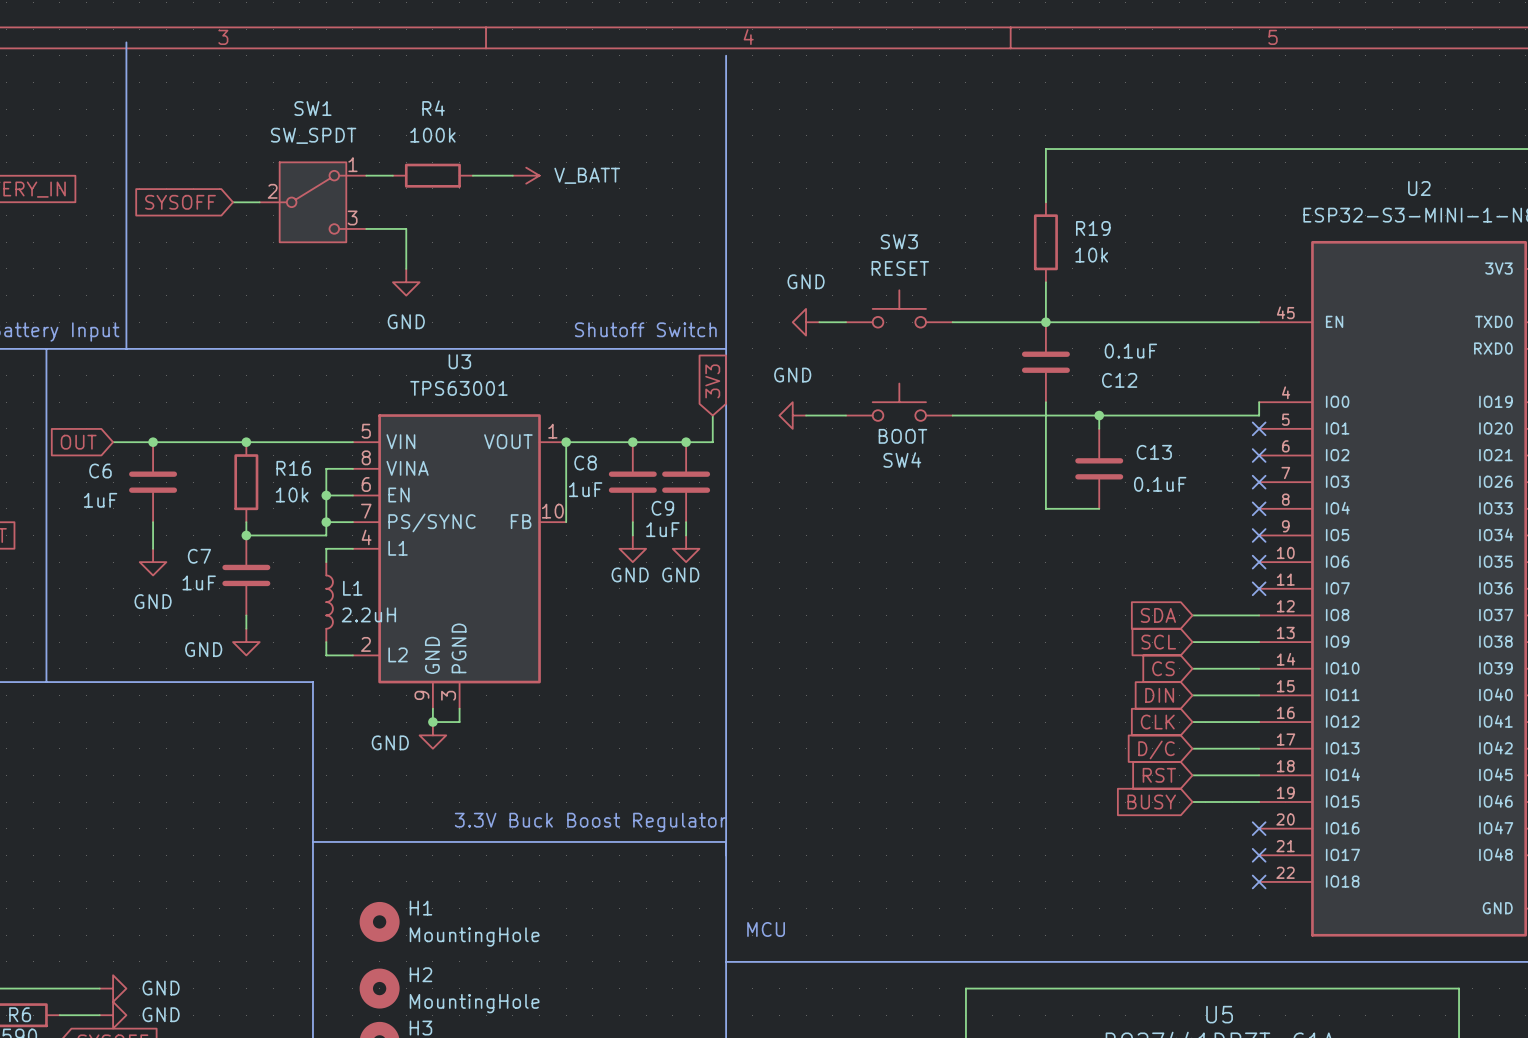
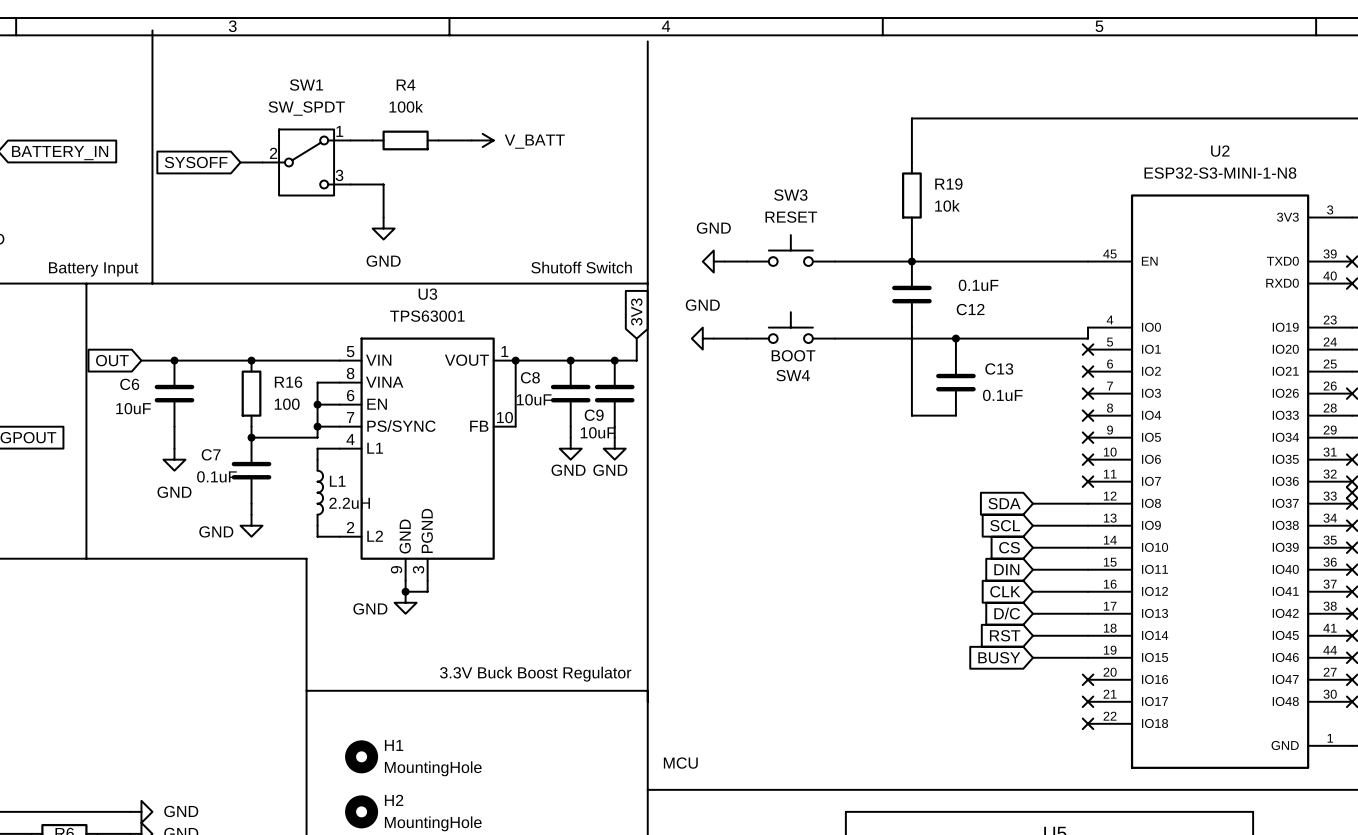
C8 value: 1uF (585, 489) -> 10uF (534, 399)
R16 value: 10k (292, 494) -> 100 (287, 404)
C6 value: 1uF (100, 500) -> 10uF (133, 408)
C9 value: 1uF (662, 529) -> 10uF (598, 432)
C7 value: 1uF (199, 582) -> 0.1uF (216, 476)

